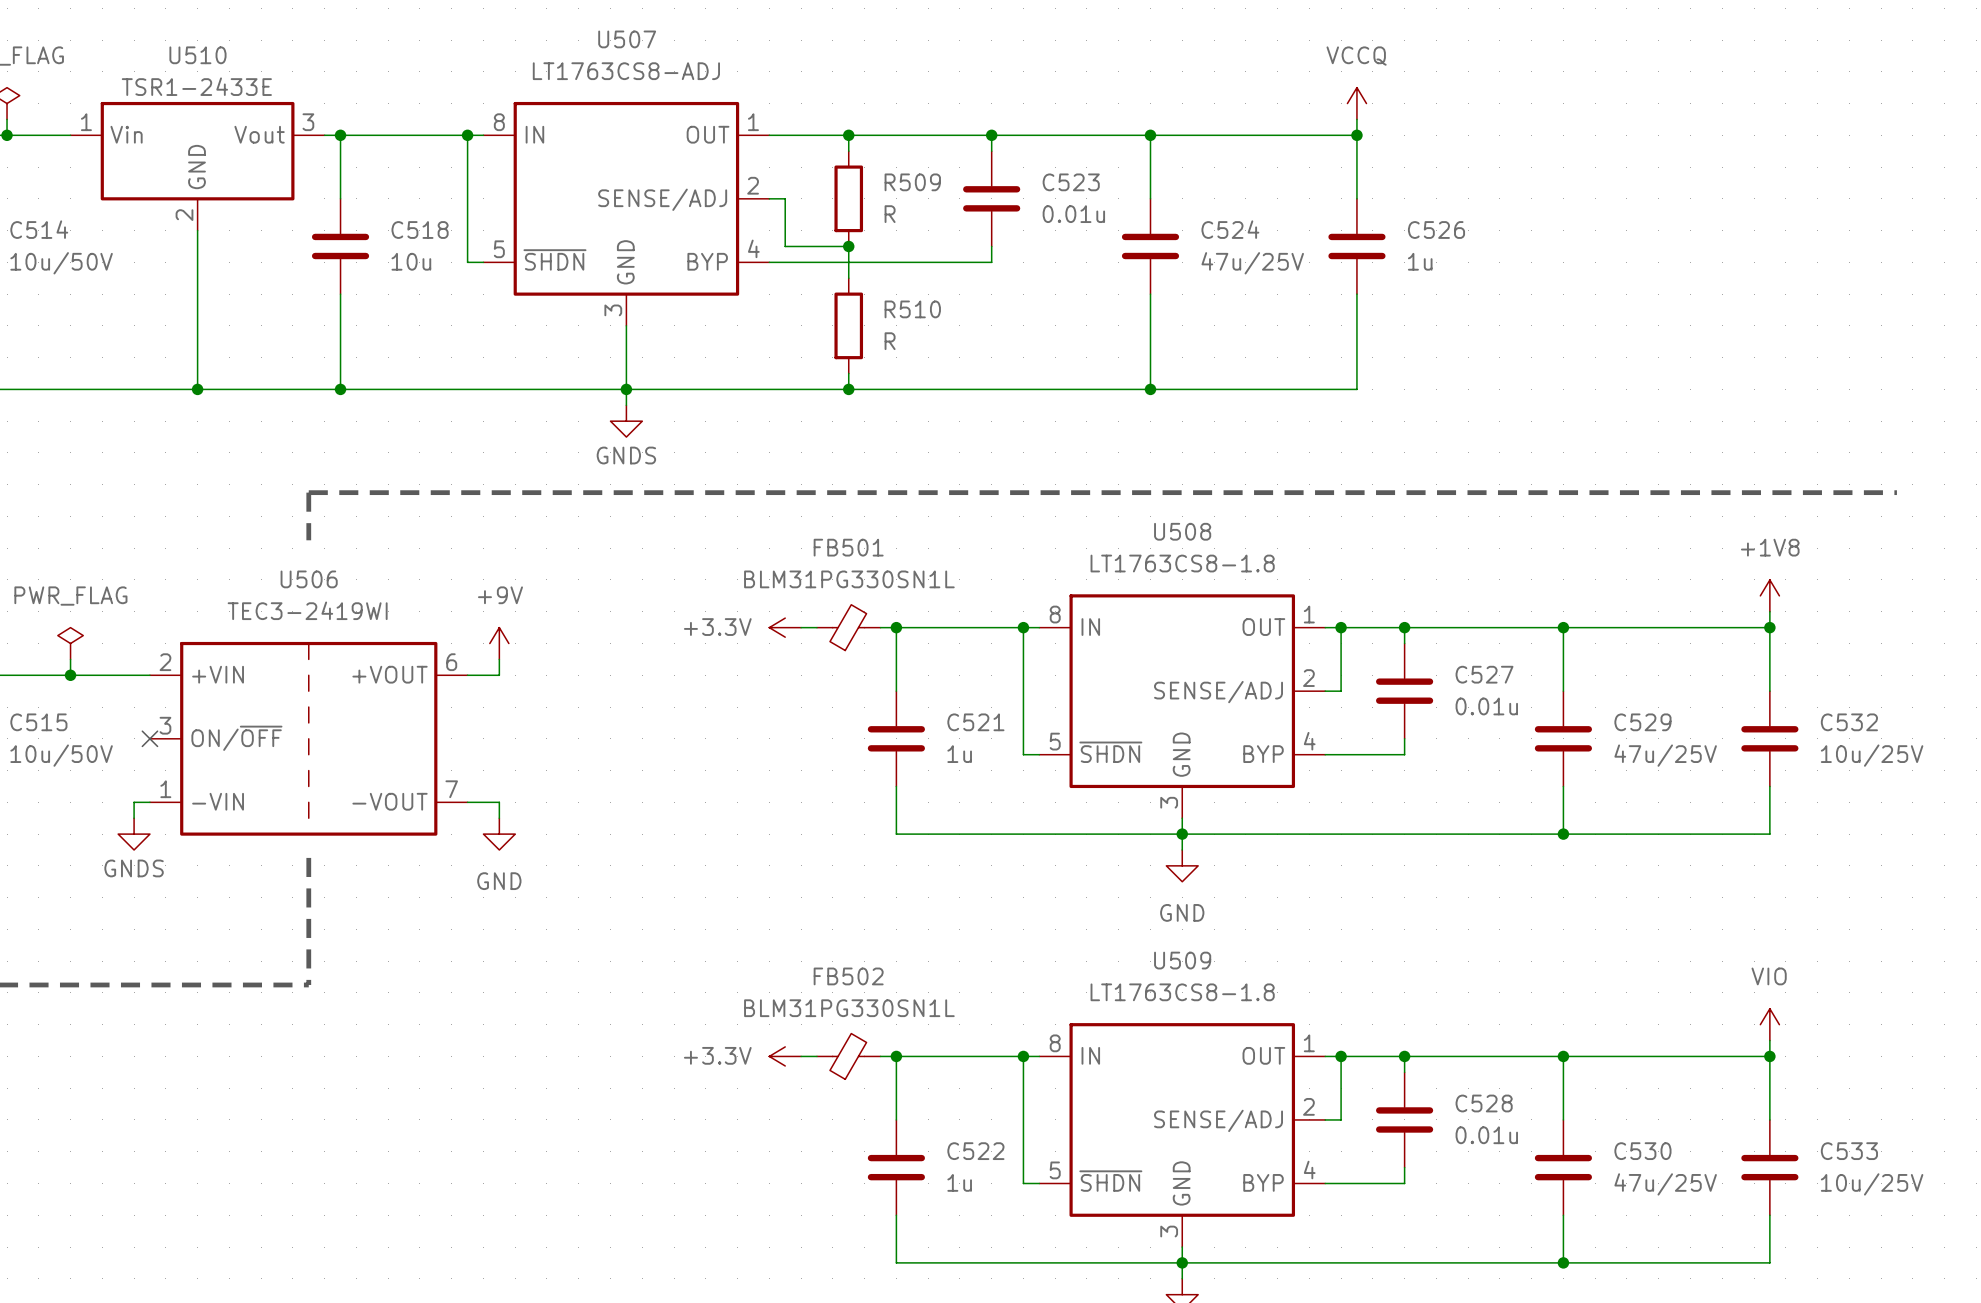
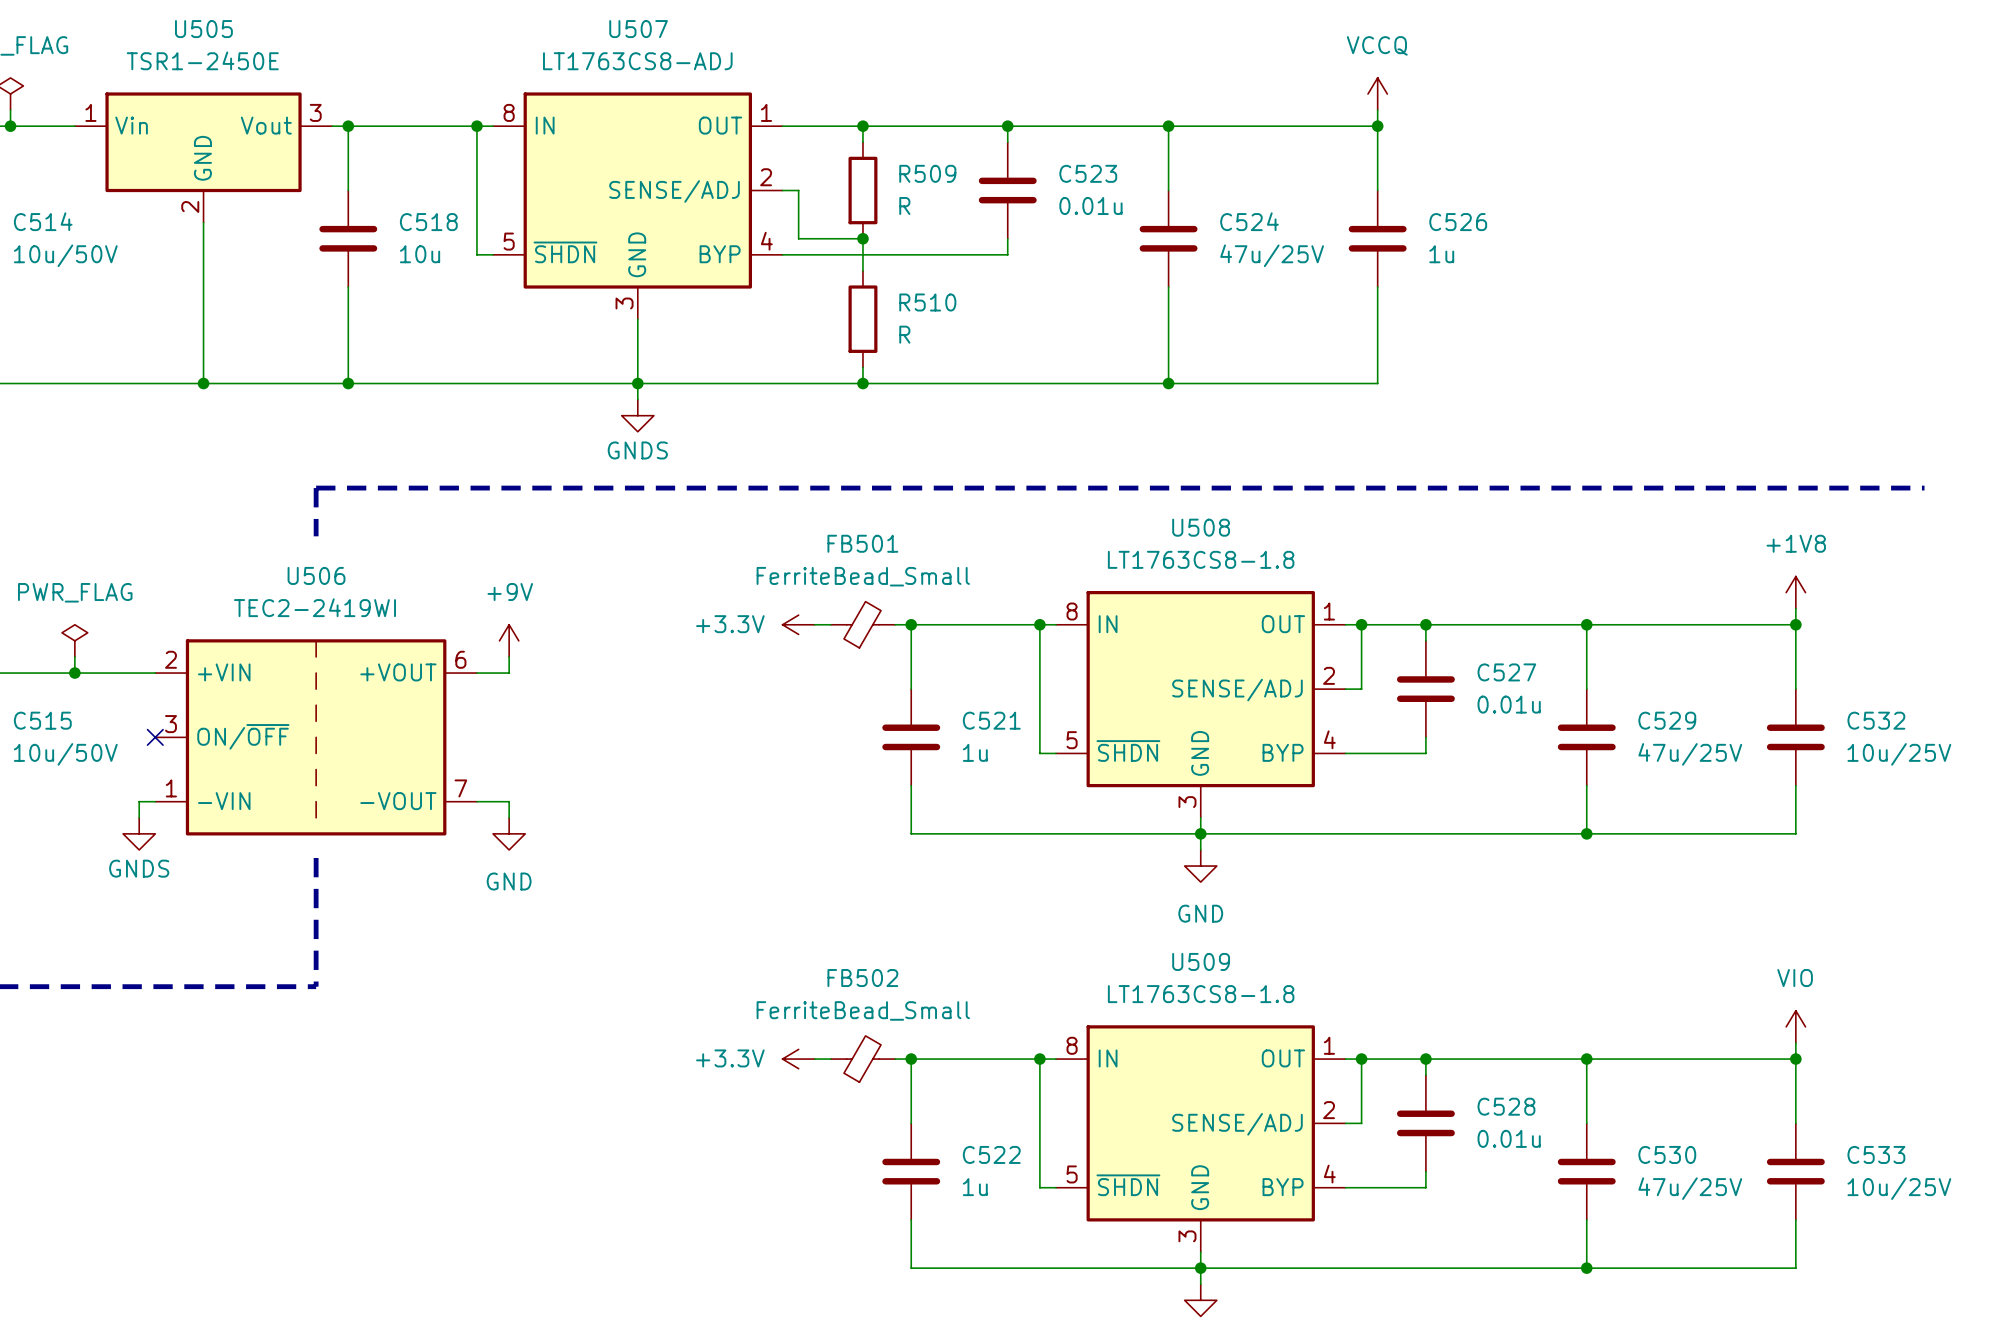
U510 name: U510 (197, 55) -> U505 (203, 29)
U510 value: TSR1-2433E (196, 86) -> TSR1-2450E (202, 60)
FB501 value: BLM31PG330SN1L (849, 579) -> FerriteBead_Small (863, 576)
U506 value: TEC3-2419WI (307, 610) -> TEC2-2419WI (314, 607)
FB502 value: BLM31PG330SN1L (849, 1008) -> FerriteBead_Small (863, 1010)

